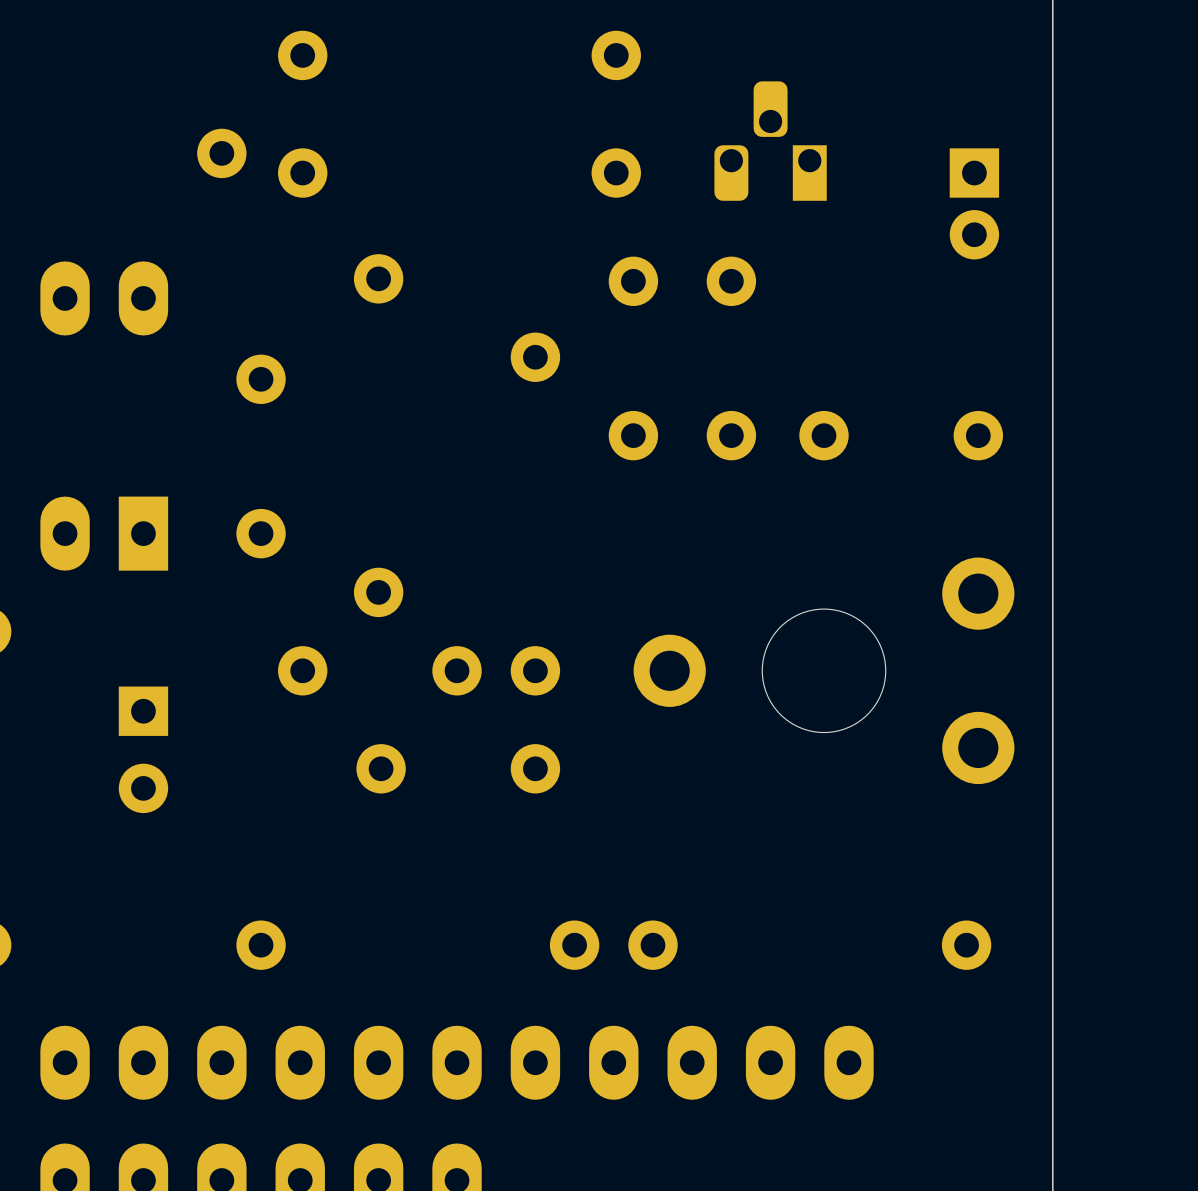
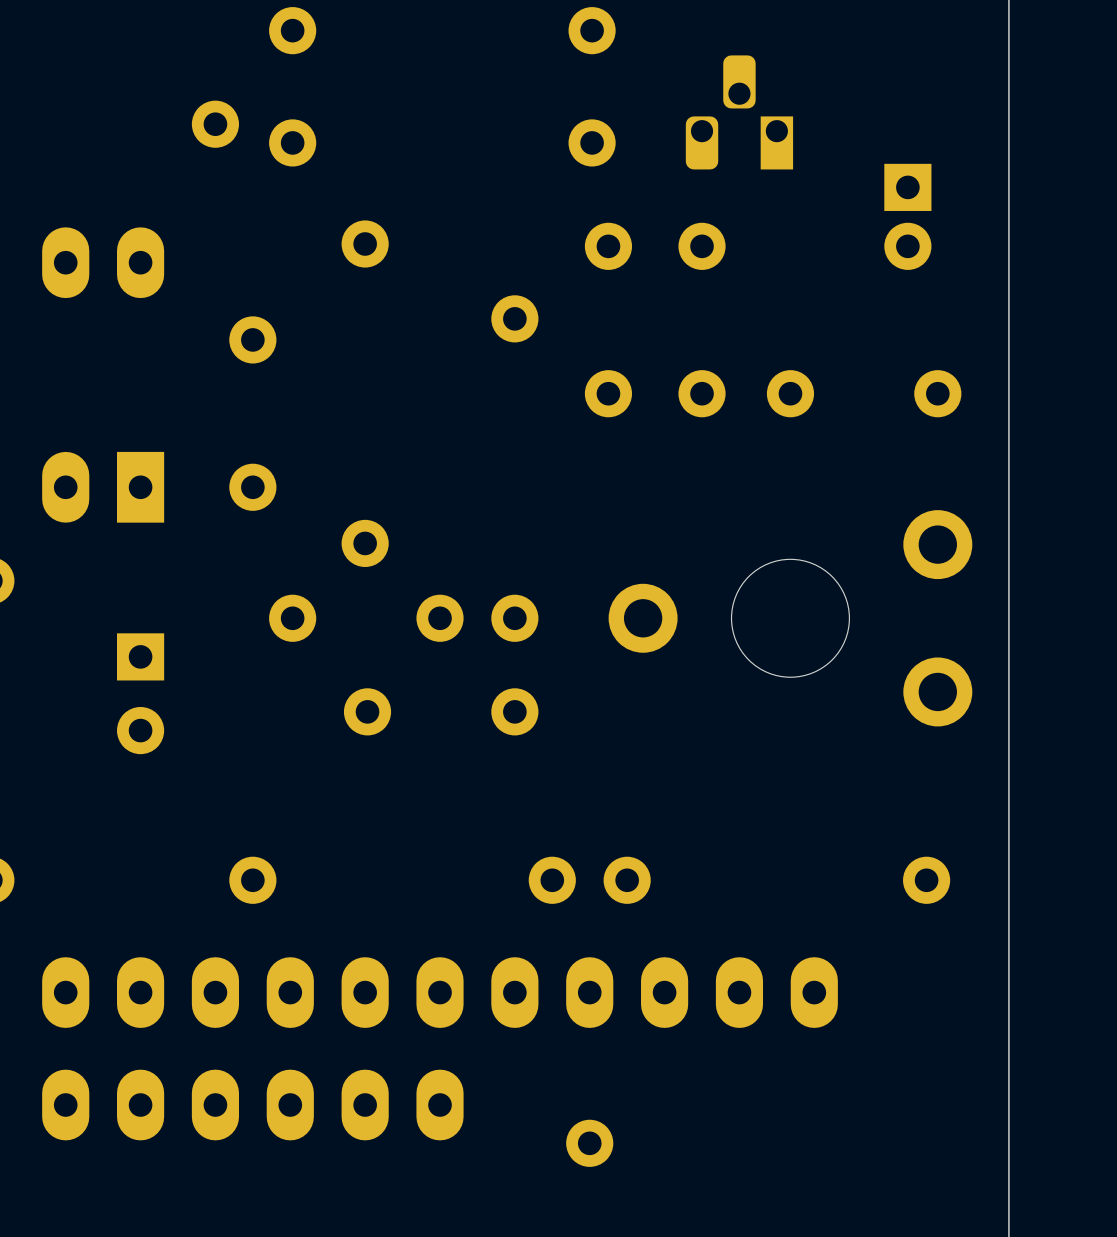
part position: (974, 203) -> (907, 216)

